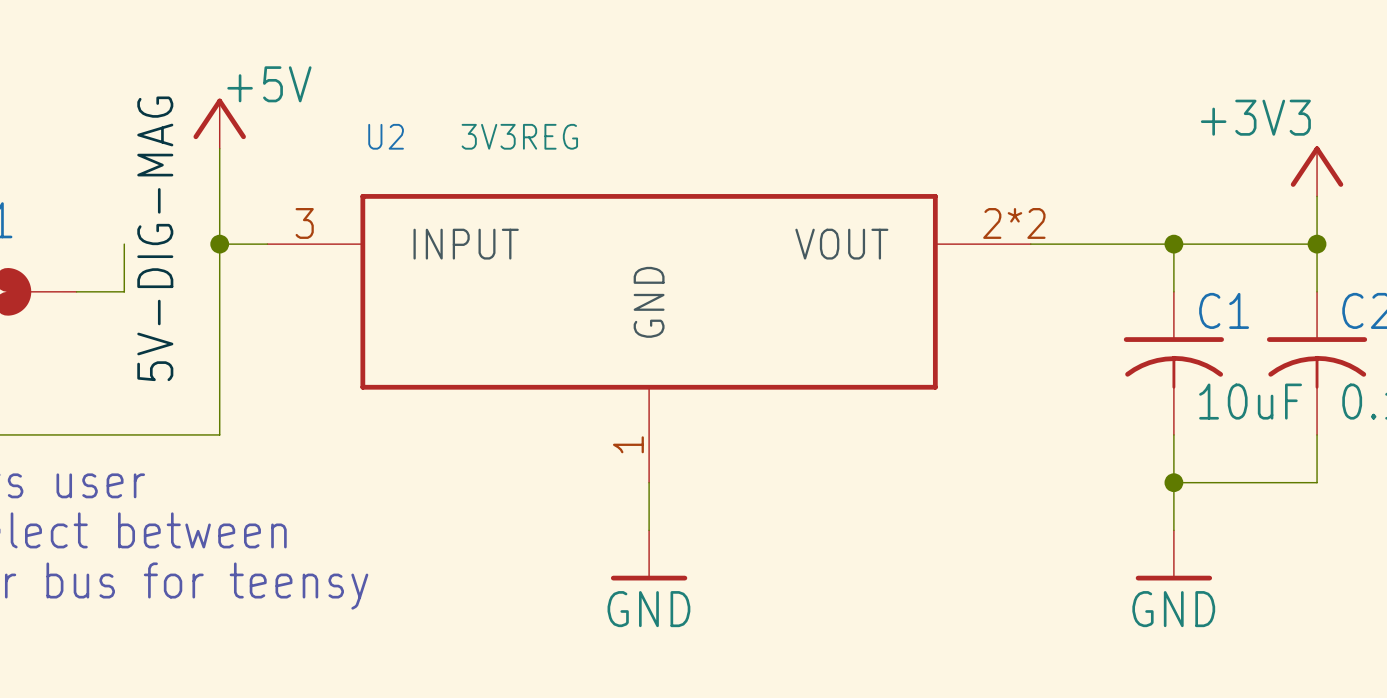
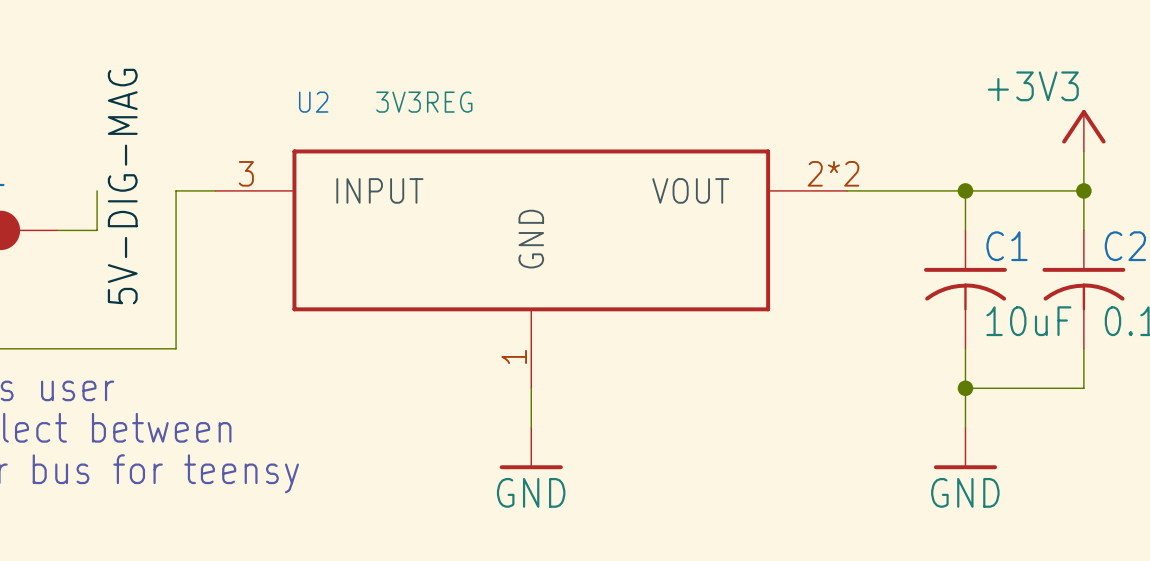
power symbol: +5V (219, 123) -> none
wire: (219, 148) (219, 244) -> none
junction: (219, 244) -> none

